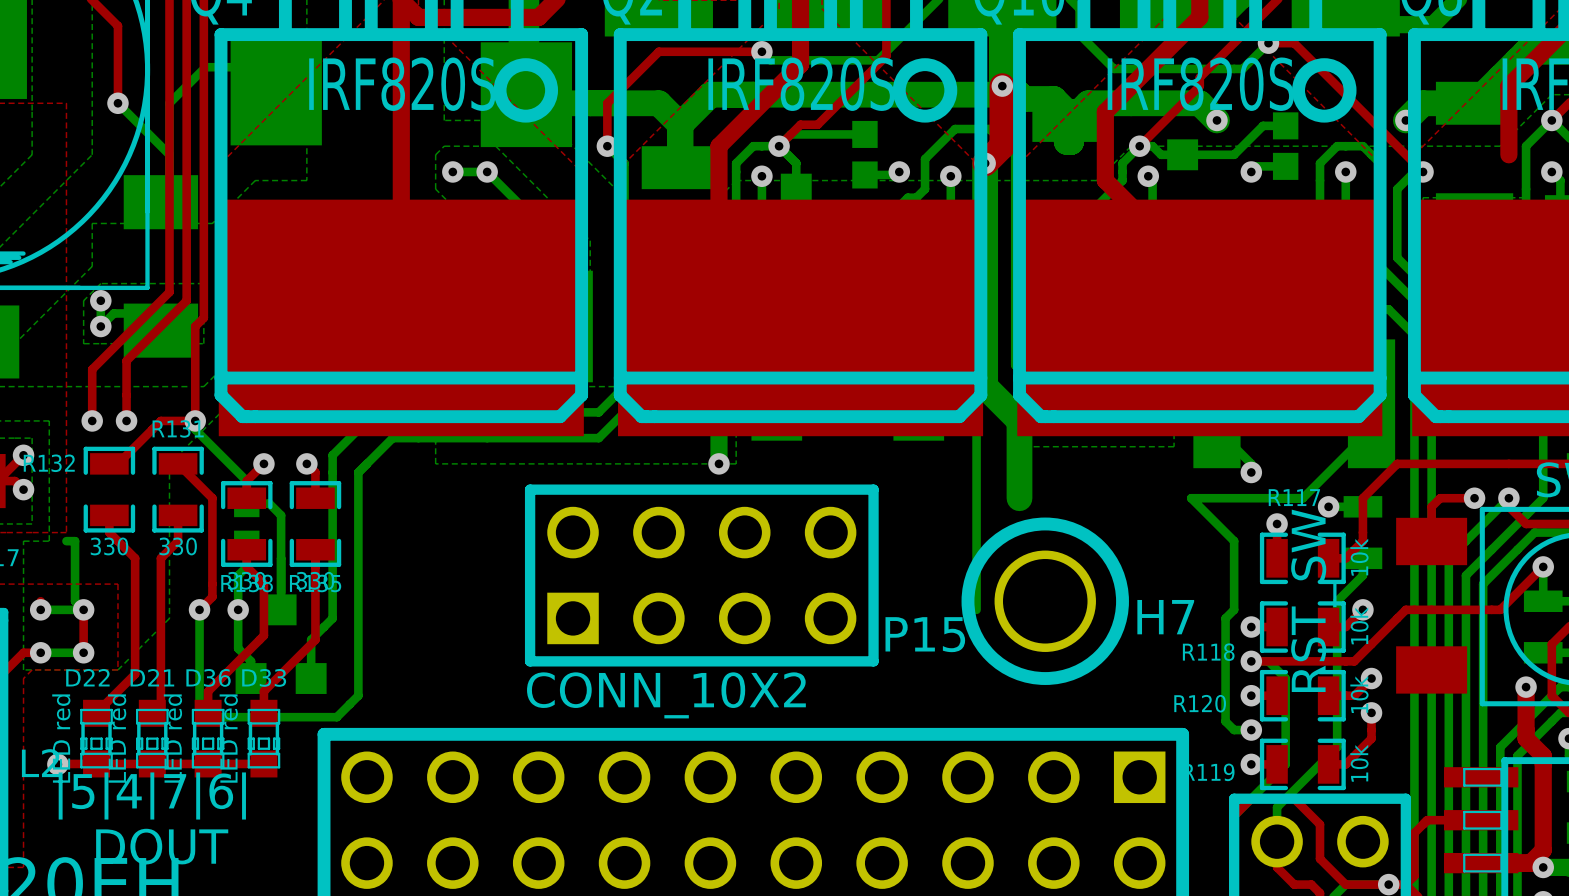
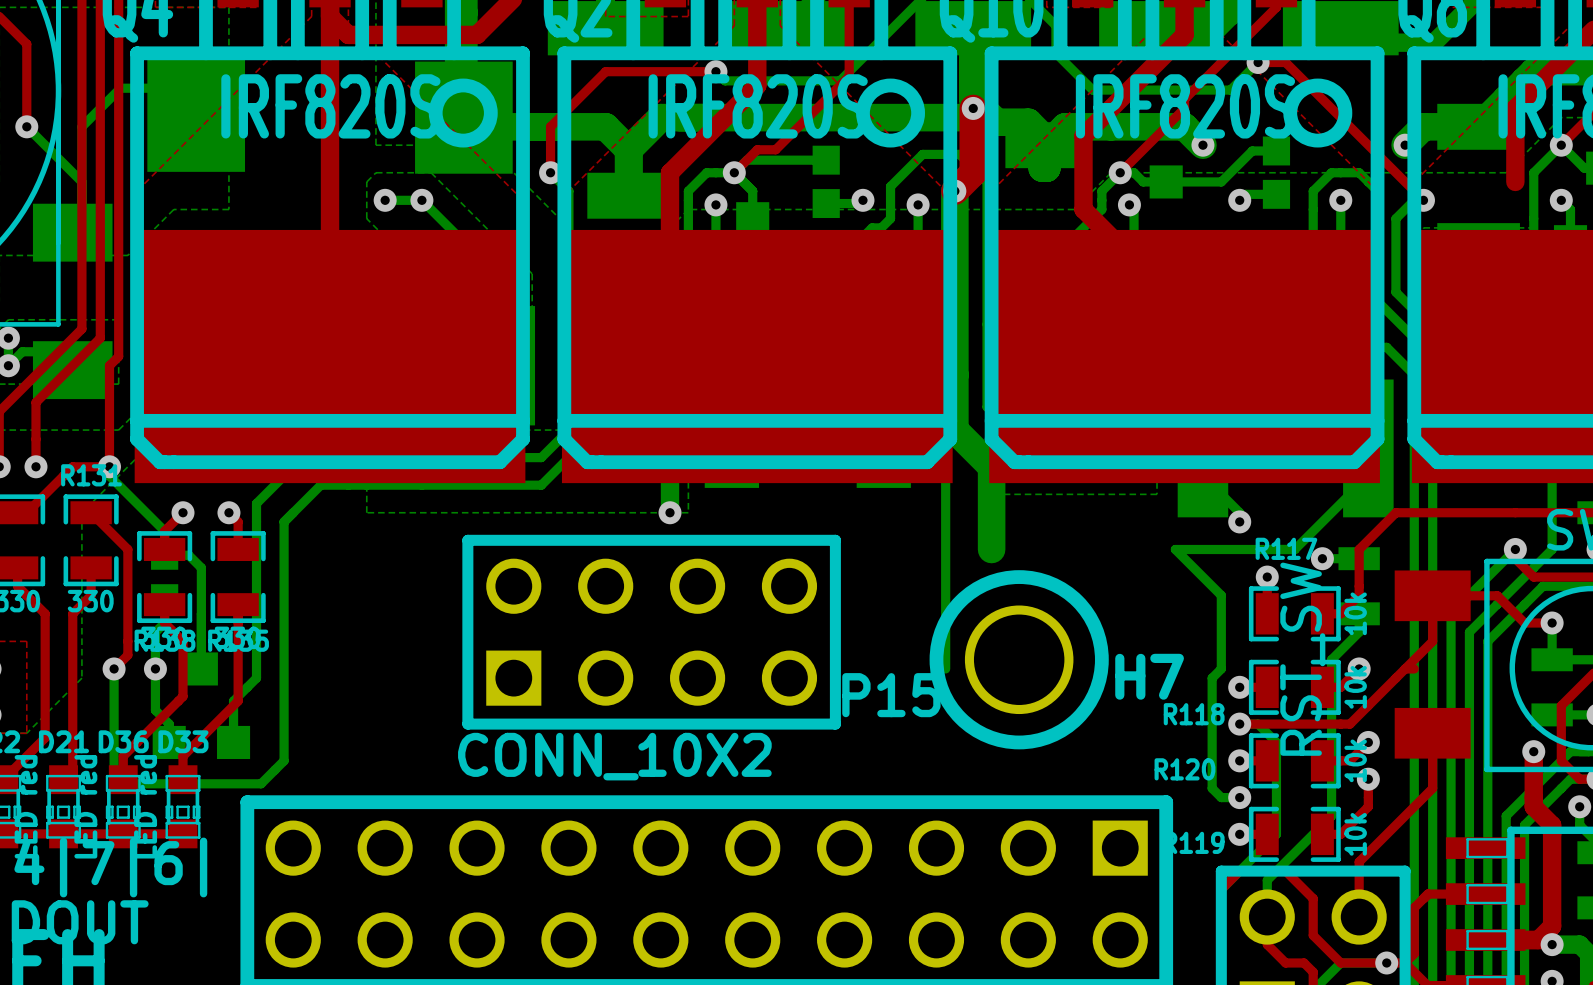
top track: (1474, 498) (1440, 498) (1431, 506) (1431, 541) -> none
via: (1474, 498) -> none
top track: (1543, 566) (1500, 609) (1414, 609) -> (1552, 623) (1524, 623) (1497, 595) (1432, 595) (1432, 641) (1405, 668)
top track: none -> (1432, 733) (1432, 788) (1359, 861) (1359, 917)

